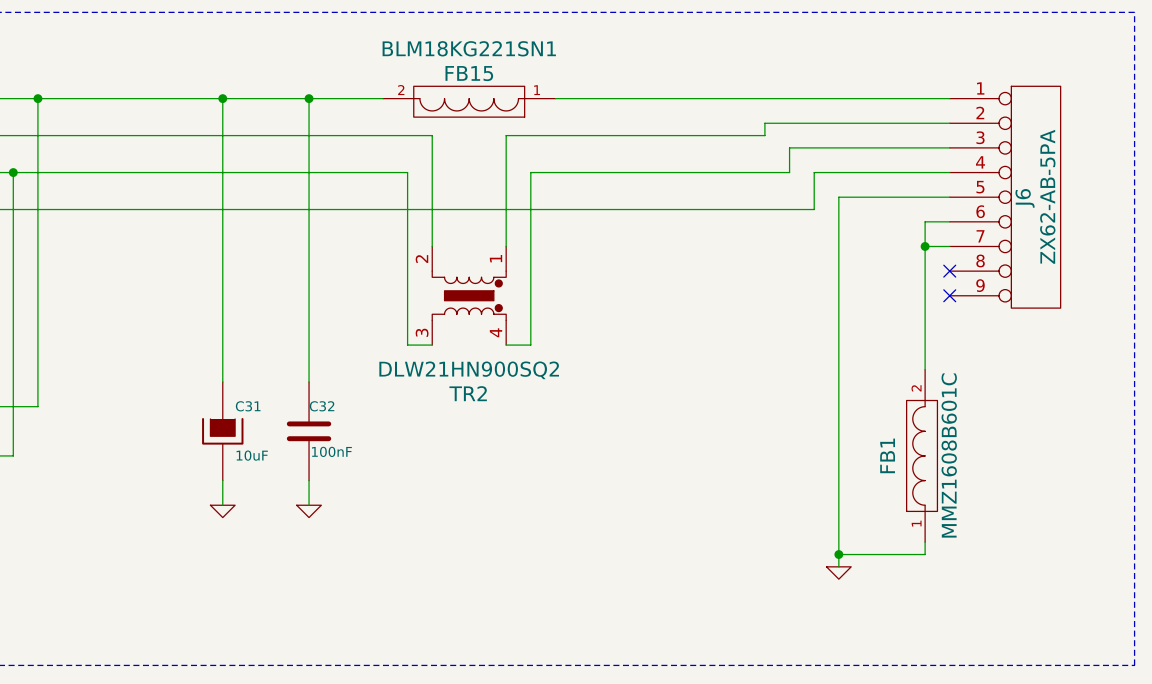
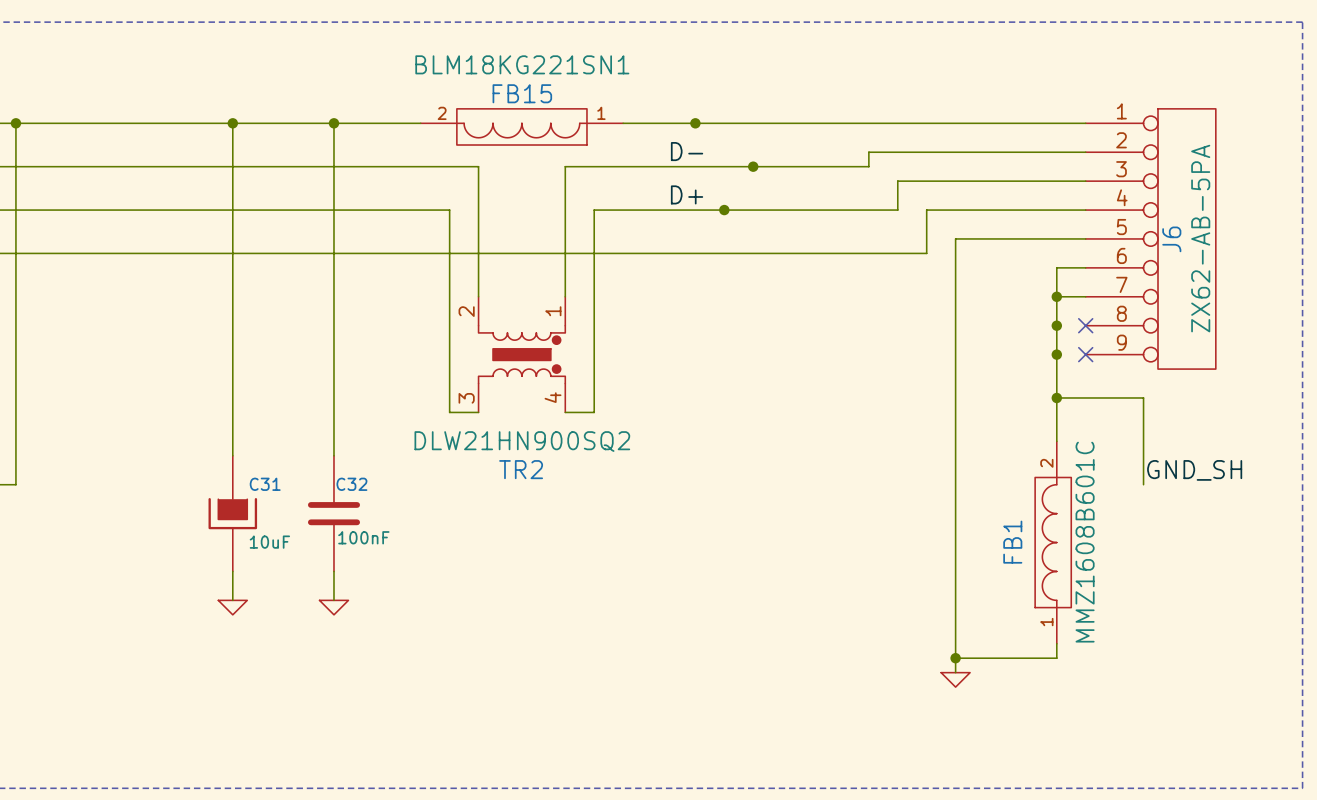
junction: none -> (695, 123)
label: none -> D- (687, 151)
junction: none -> (753, 166)
label: none -> D+ (687, 194)
junction: none -> (724, 210)
junction: none -> (1056, 325)
junction: none -> (1056, 354)
wire: none -> (1056, 397) (1143, 397) (1143, 484)
junction: none -> (1056, 397)
label: none -> GND_SH (1194, 470)

